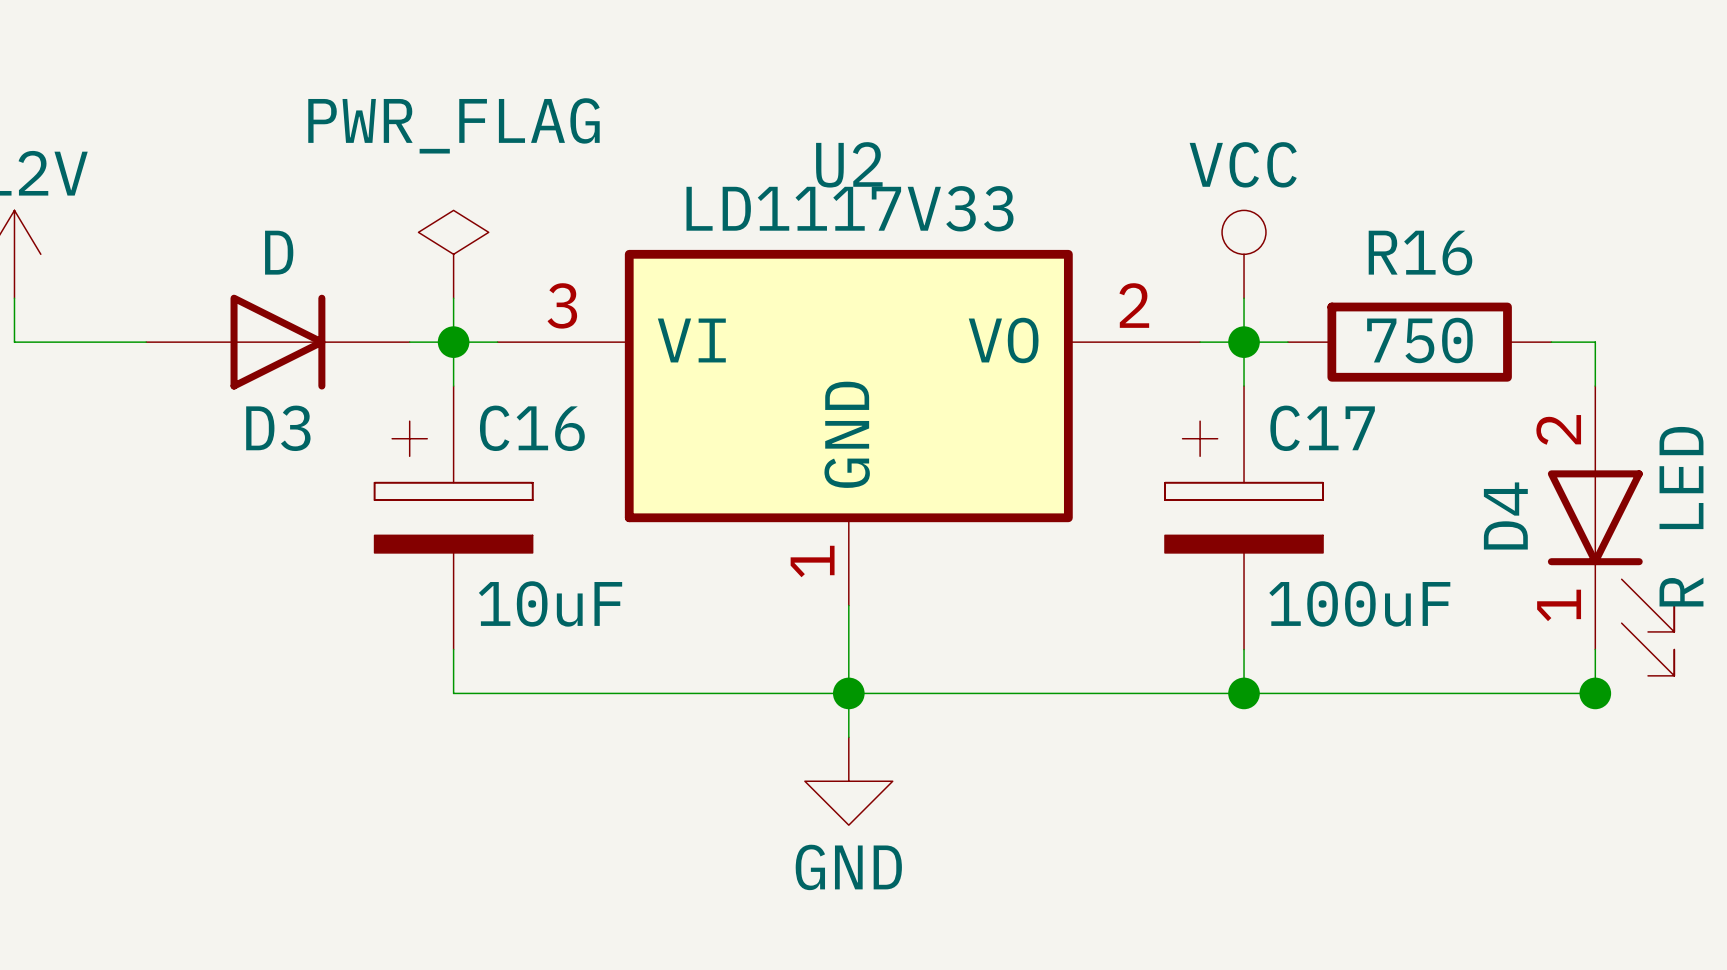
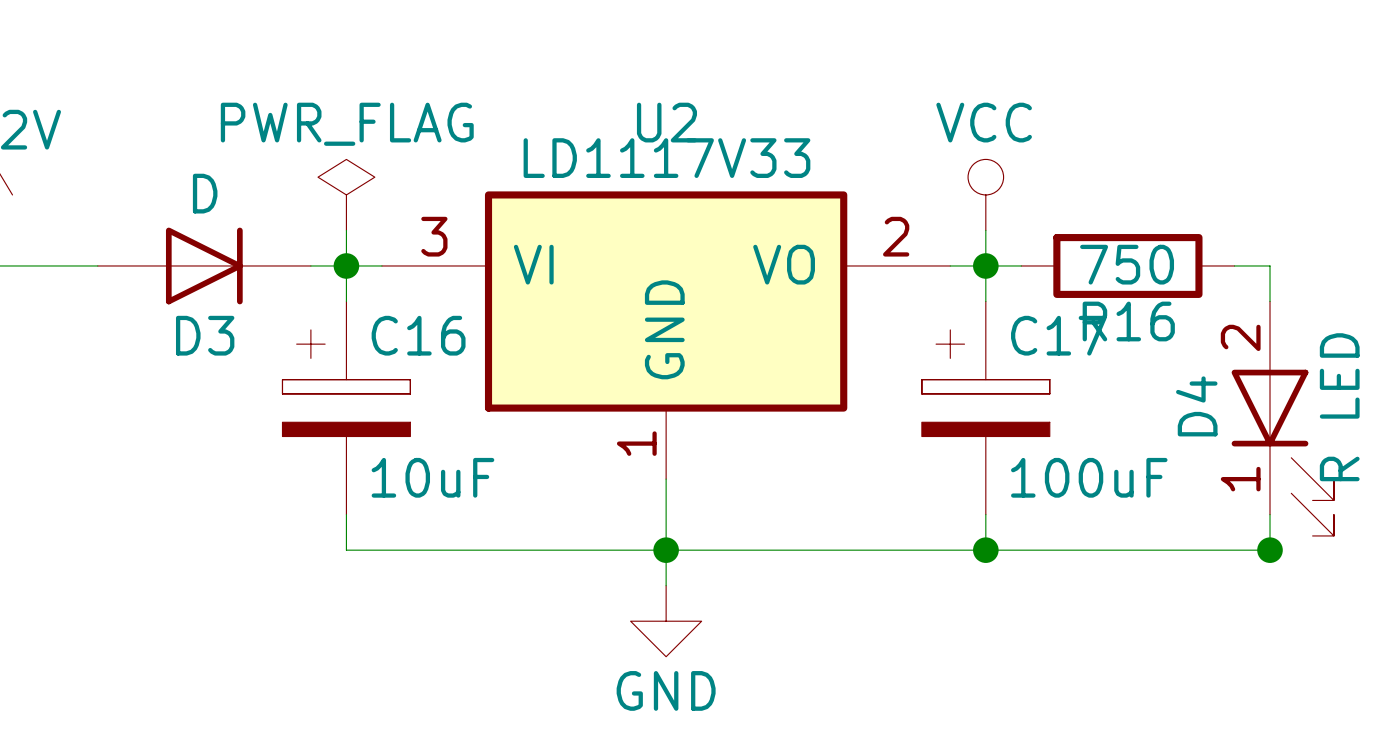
power symbol text position: PWR_FLAG (453, 125) -> PWR_FLAG (347, 124)
R16 name position: R16 (1420, 253) -> R16 (1128, 321)

